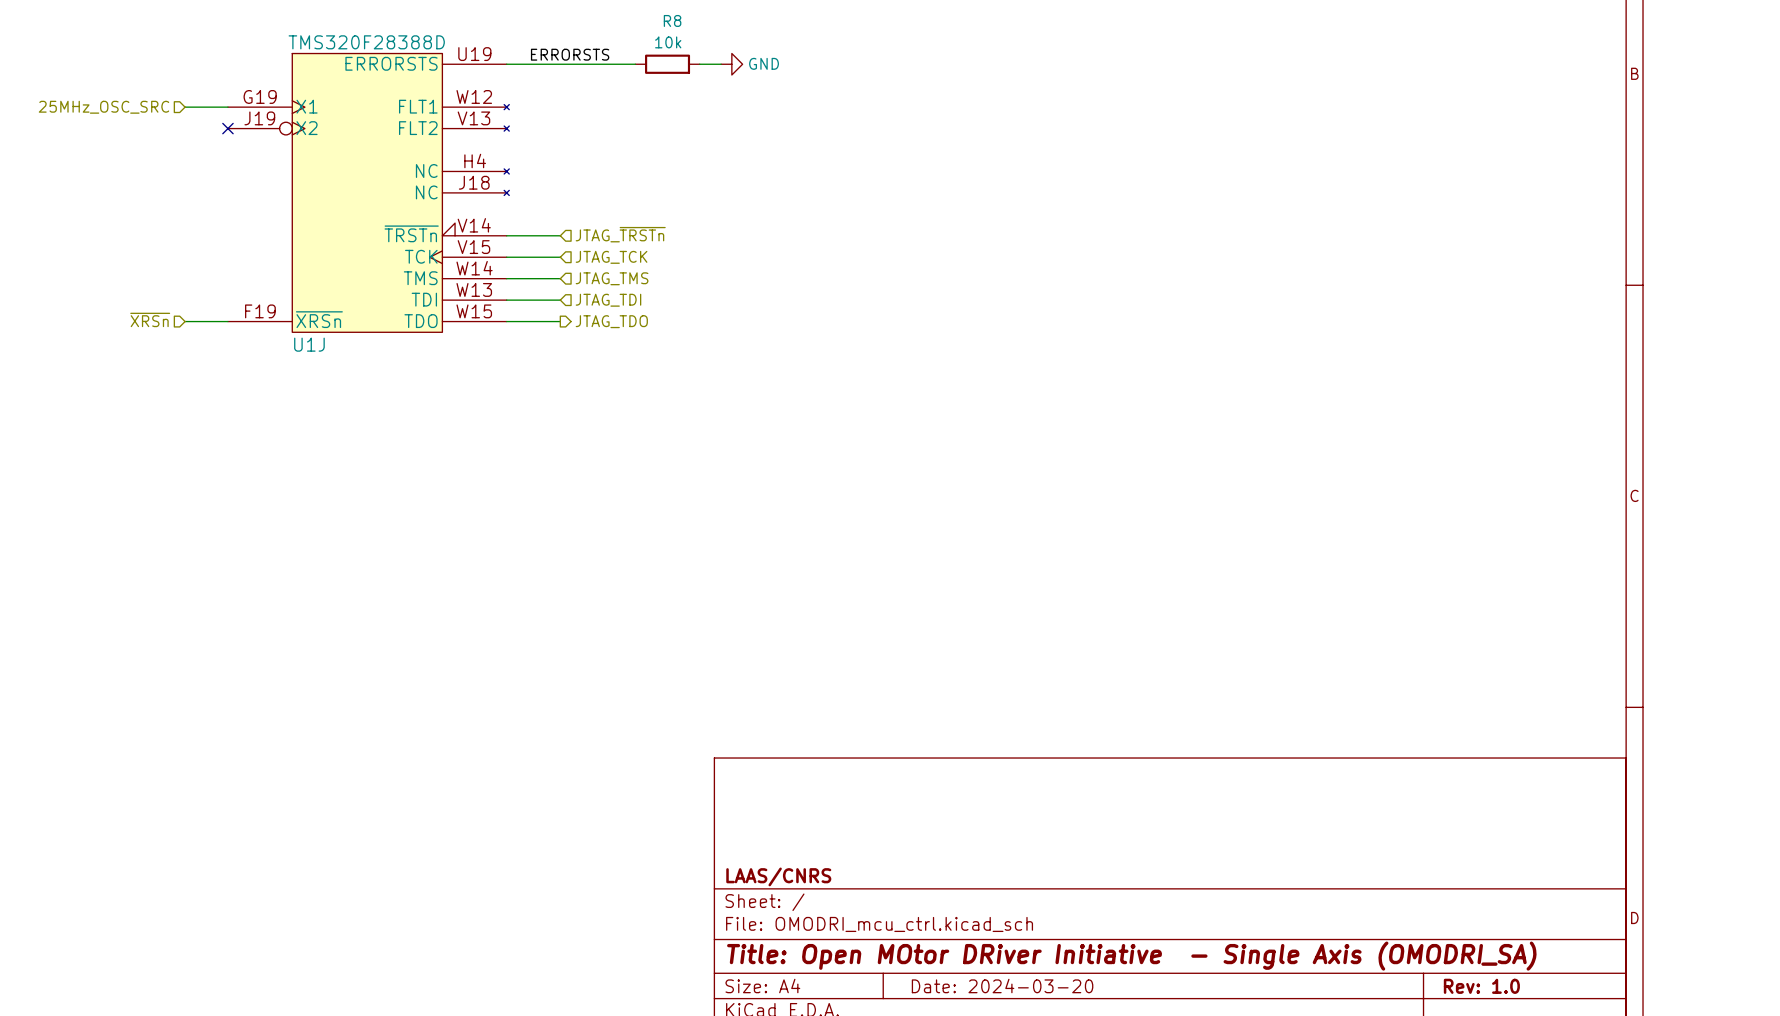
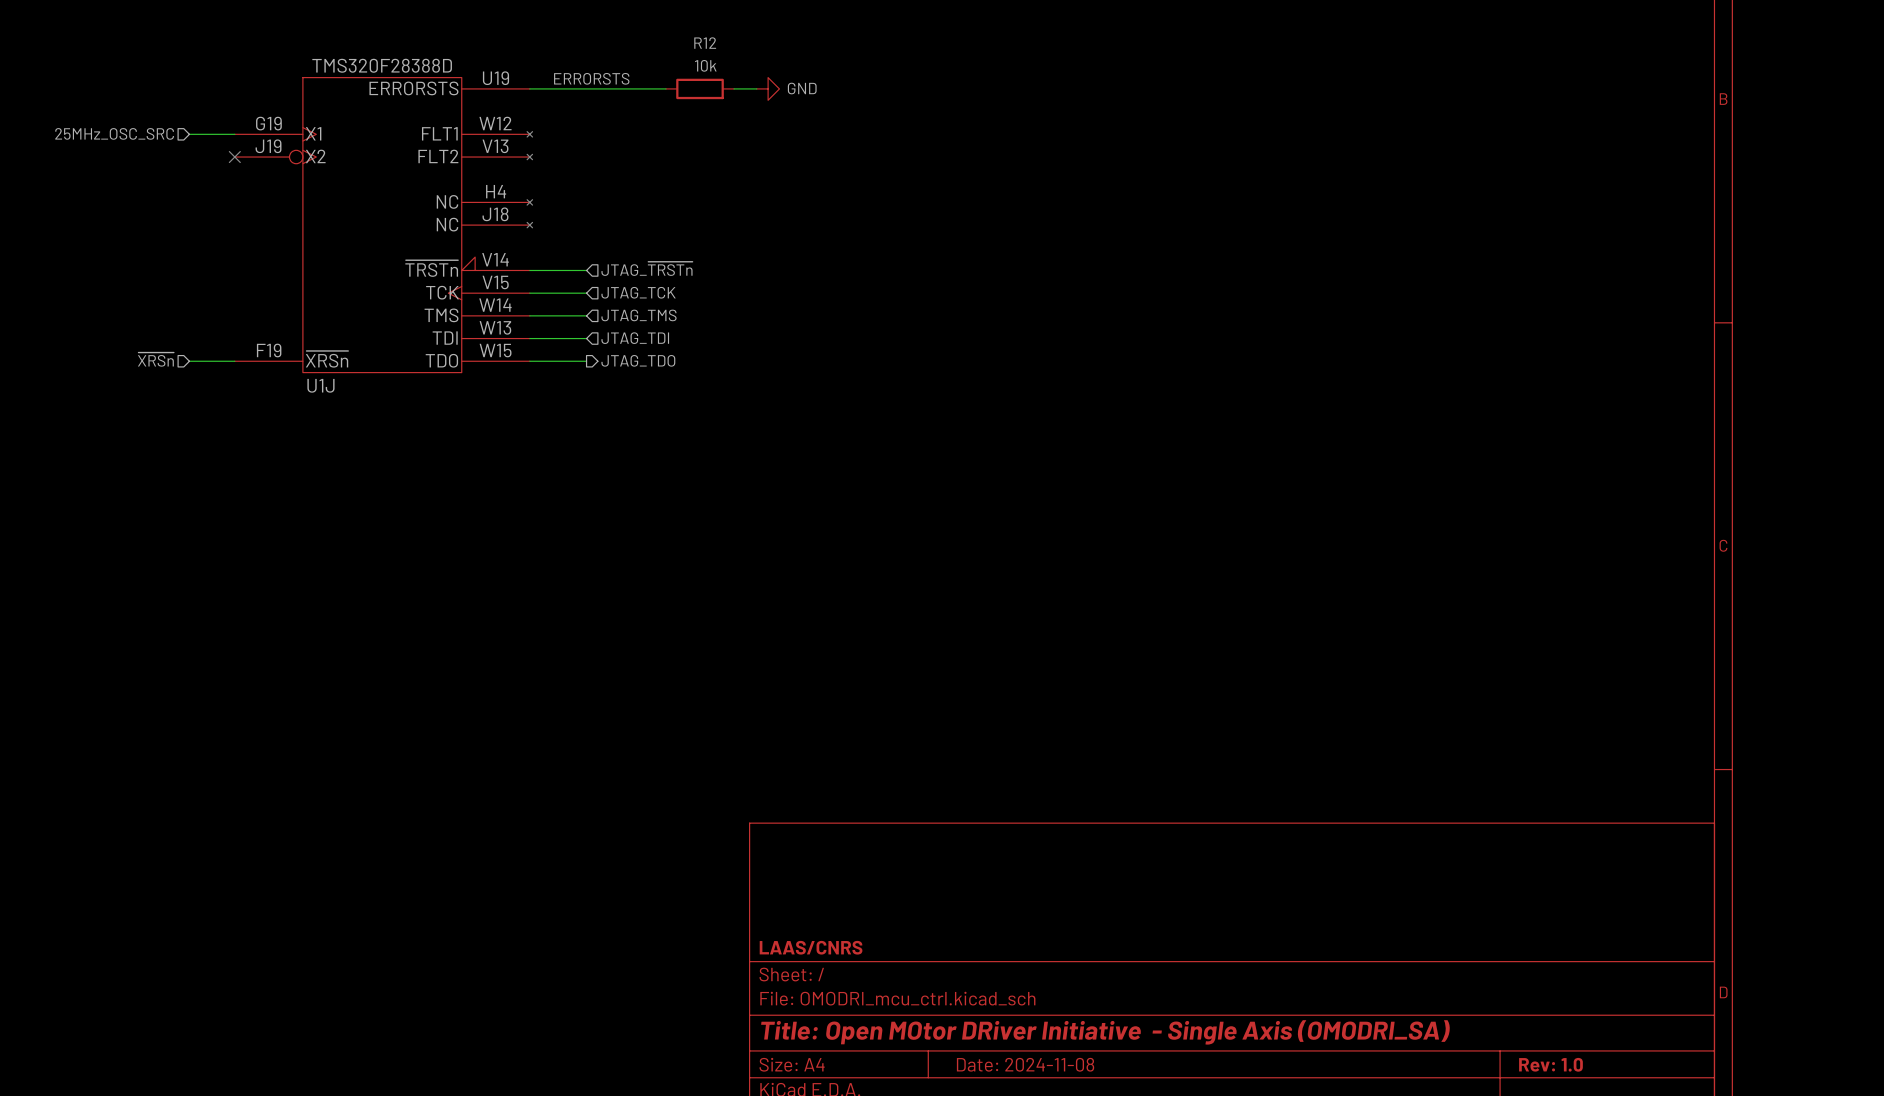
R8 name: R8 (672, 20) -> R12 (705, 43)
title block: Date: 2024-03-20 (1002, 986) -> Date: 2024-11-08 (1025, 1064)

